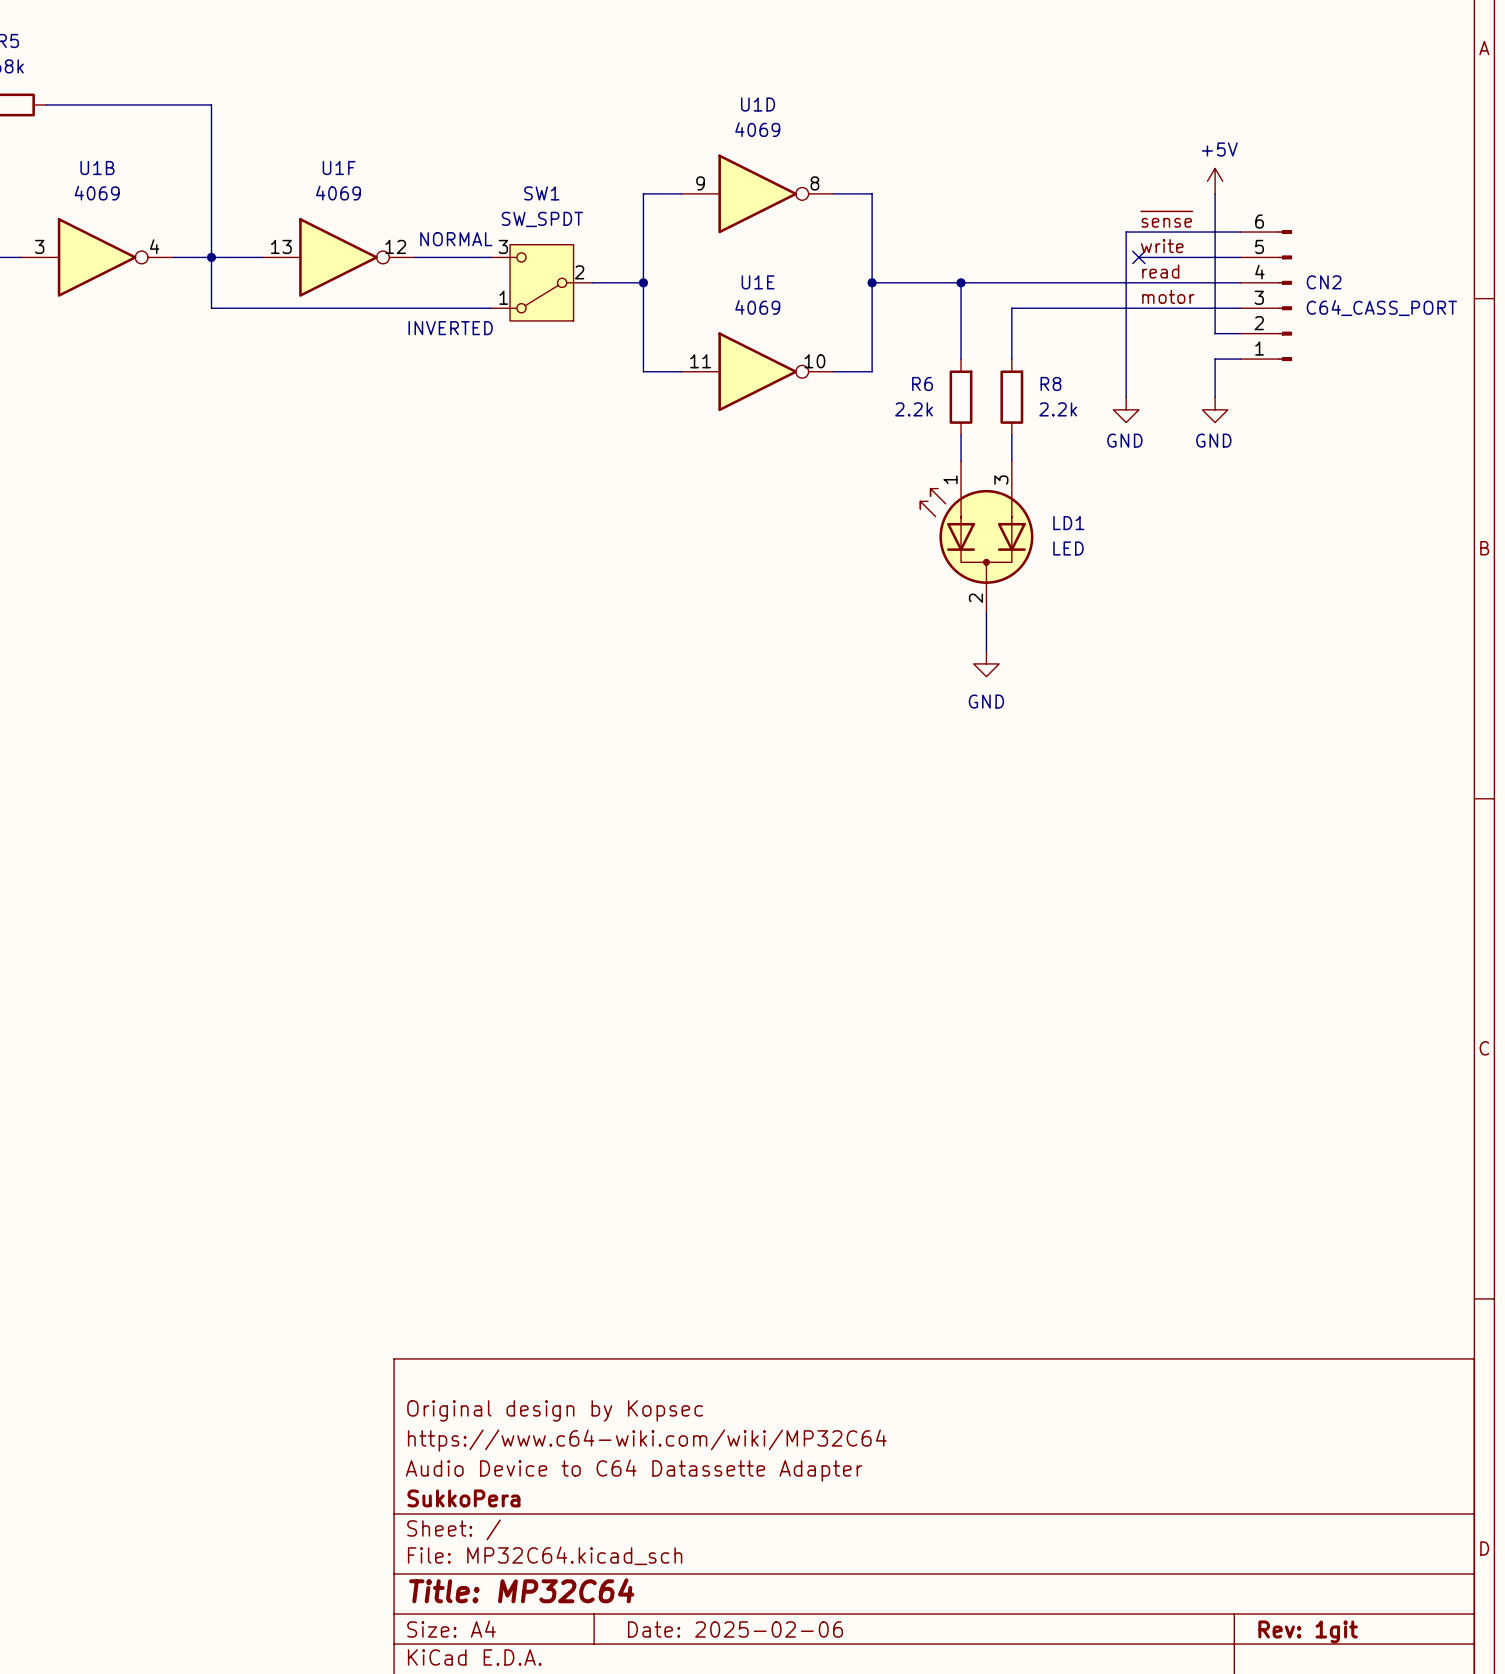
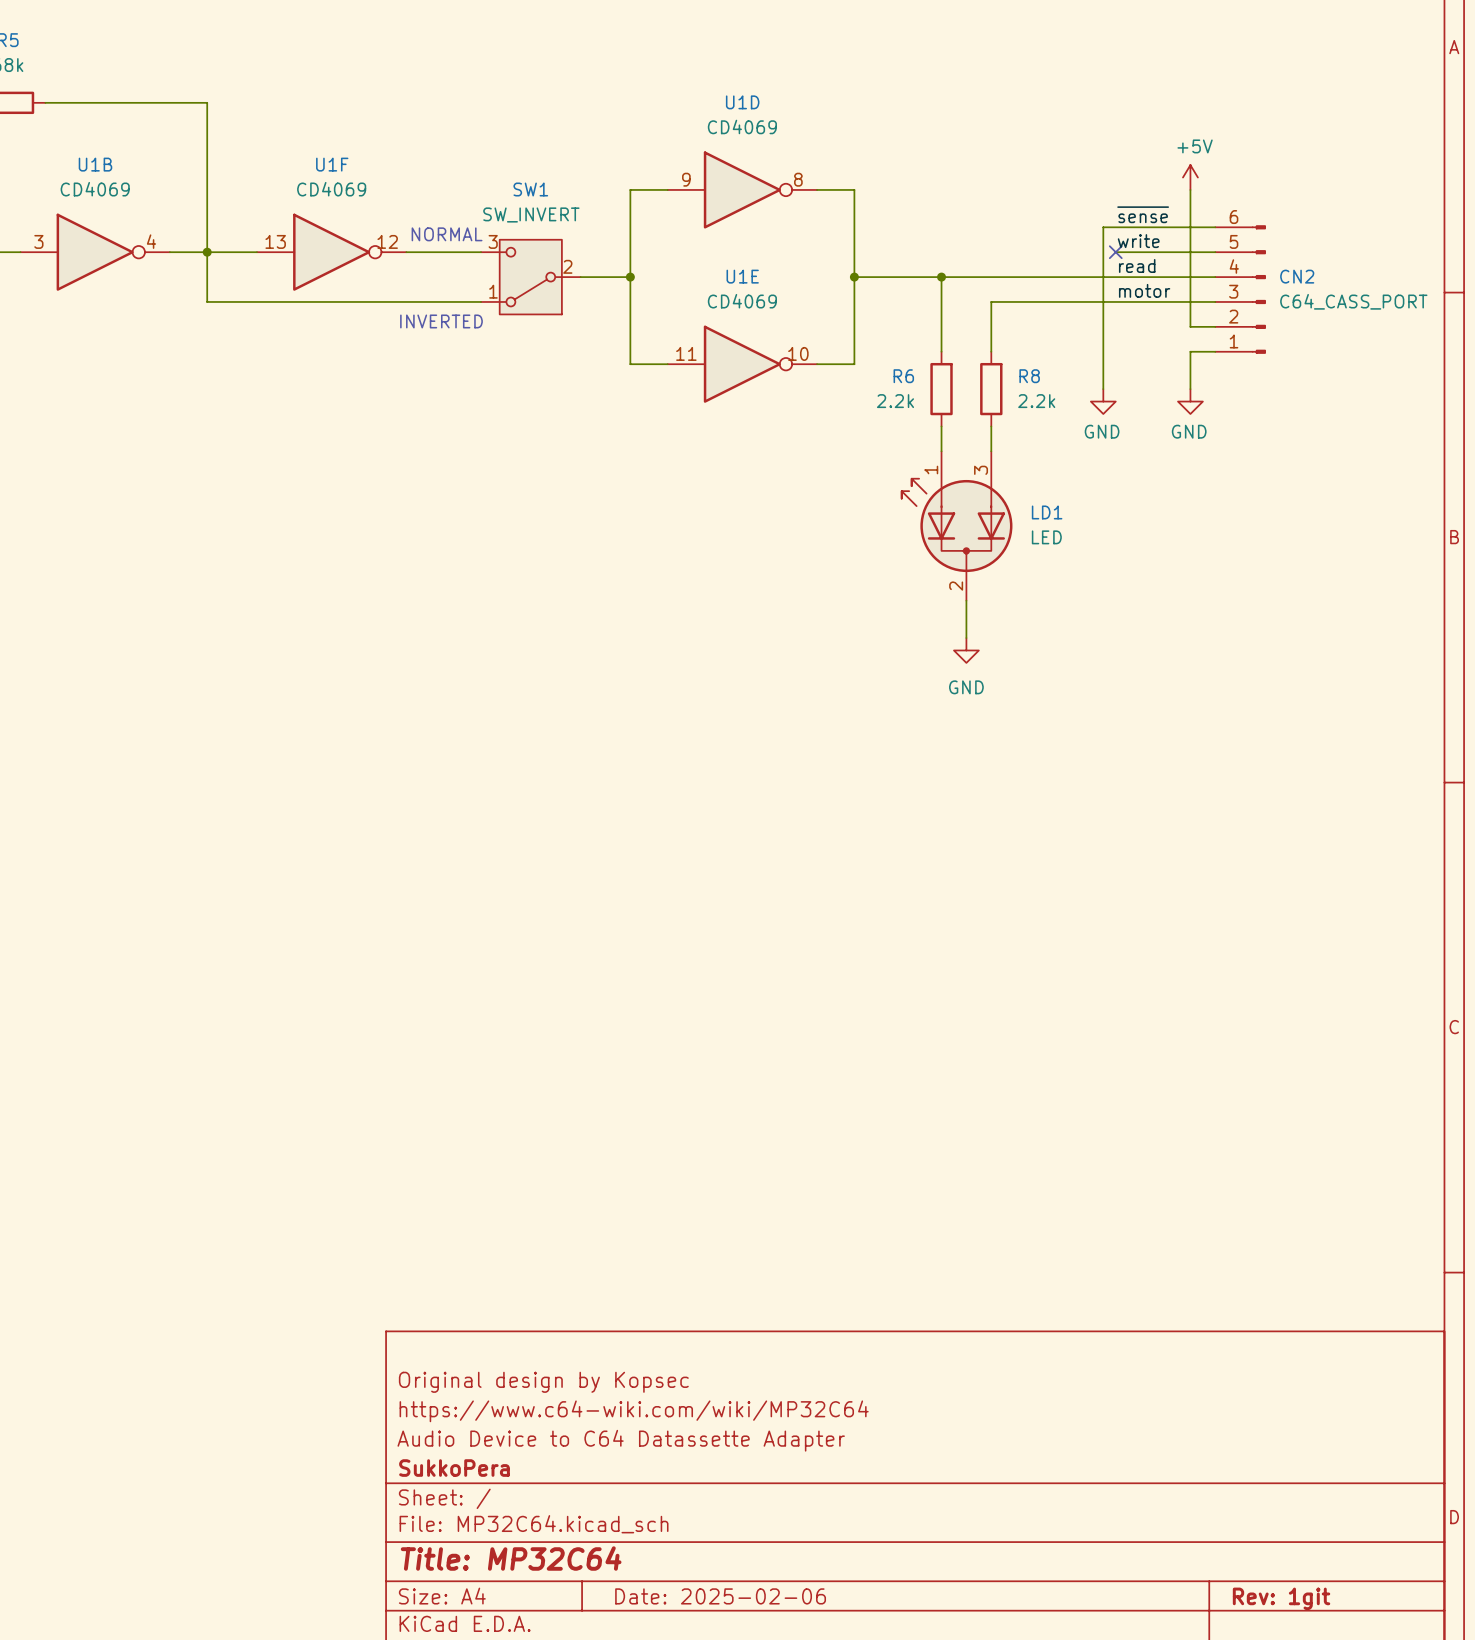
U1D value: 4069 (757, 129) -> CD4069 (742, 126)
U1B value: 4069 (97, 193) -> CD4069 (95, 189)
U1F value: 4069 (338, 193) -> CD4069 (331, 189)
SW1 value: SW_SPDT (542, 219) -> SW_INVERT (531, 214)
U1E value: 4069 (757, 307) -> CD4069 (742, 301)

